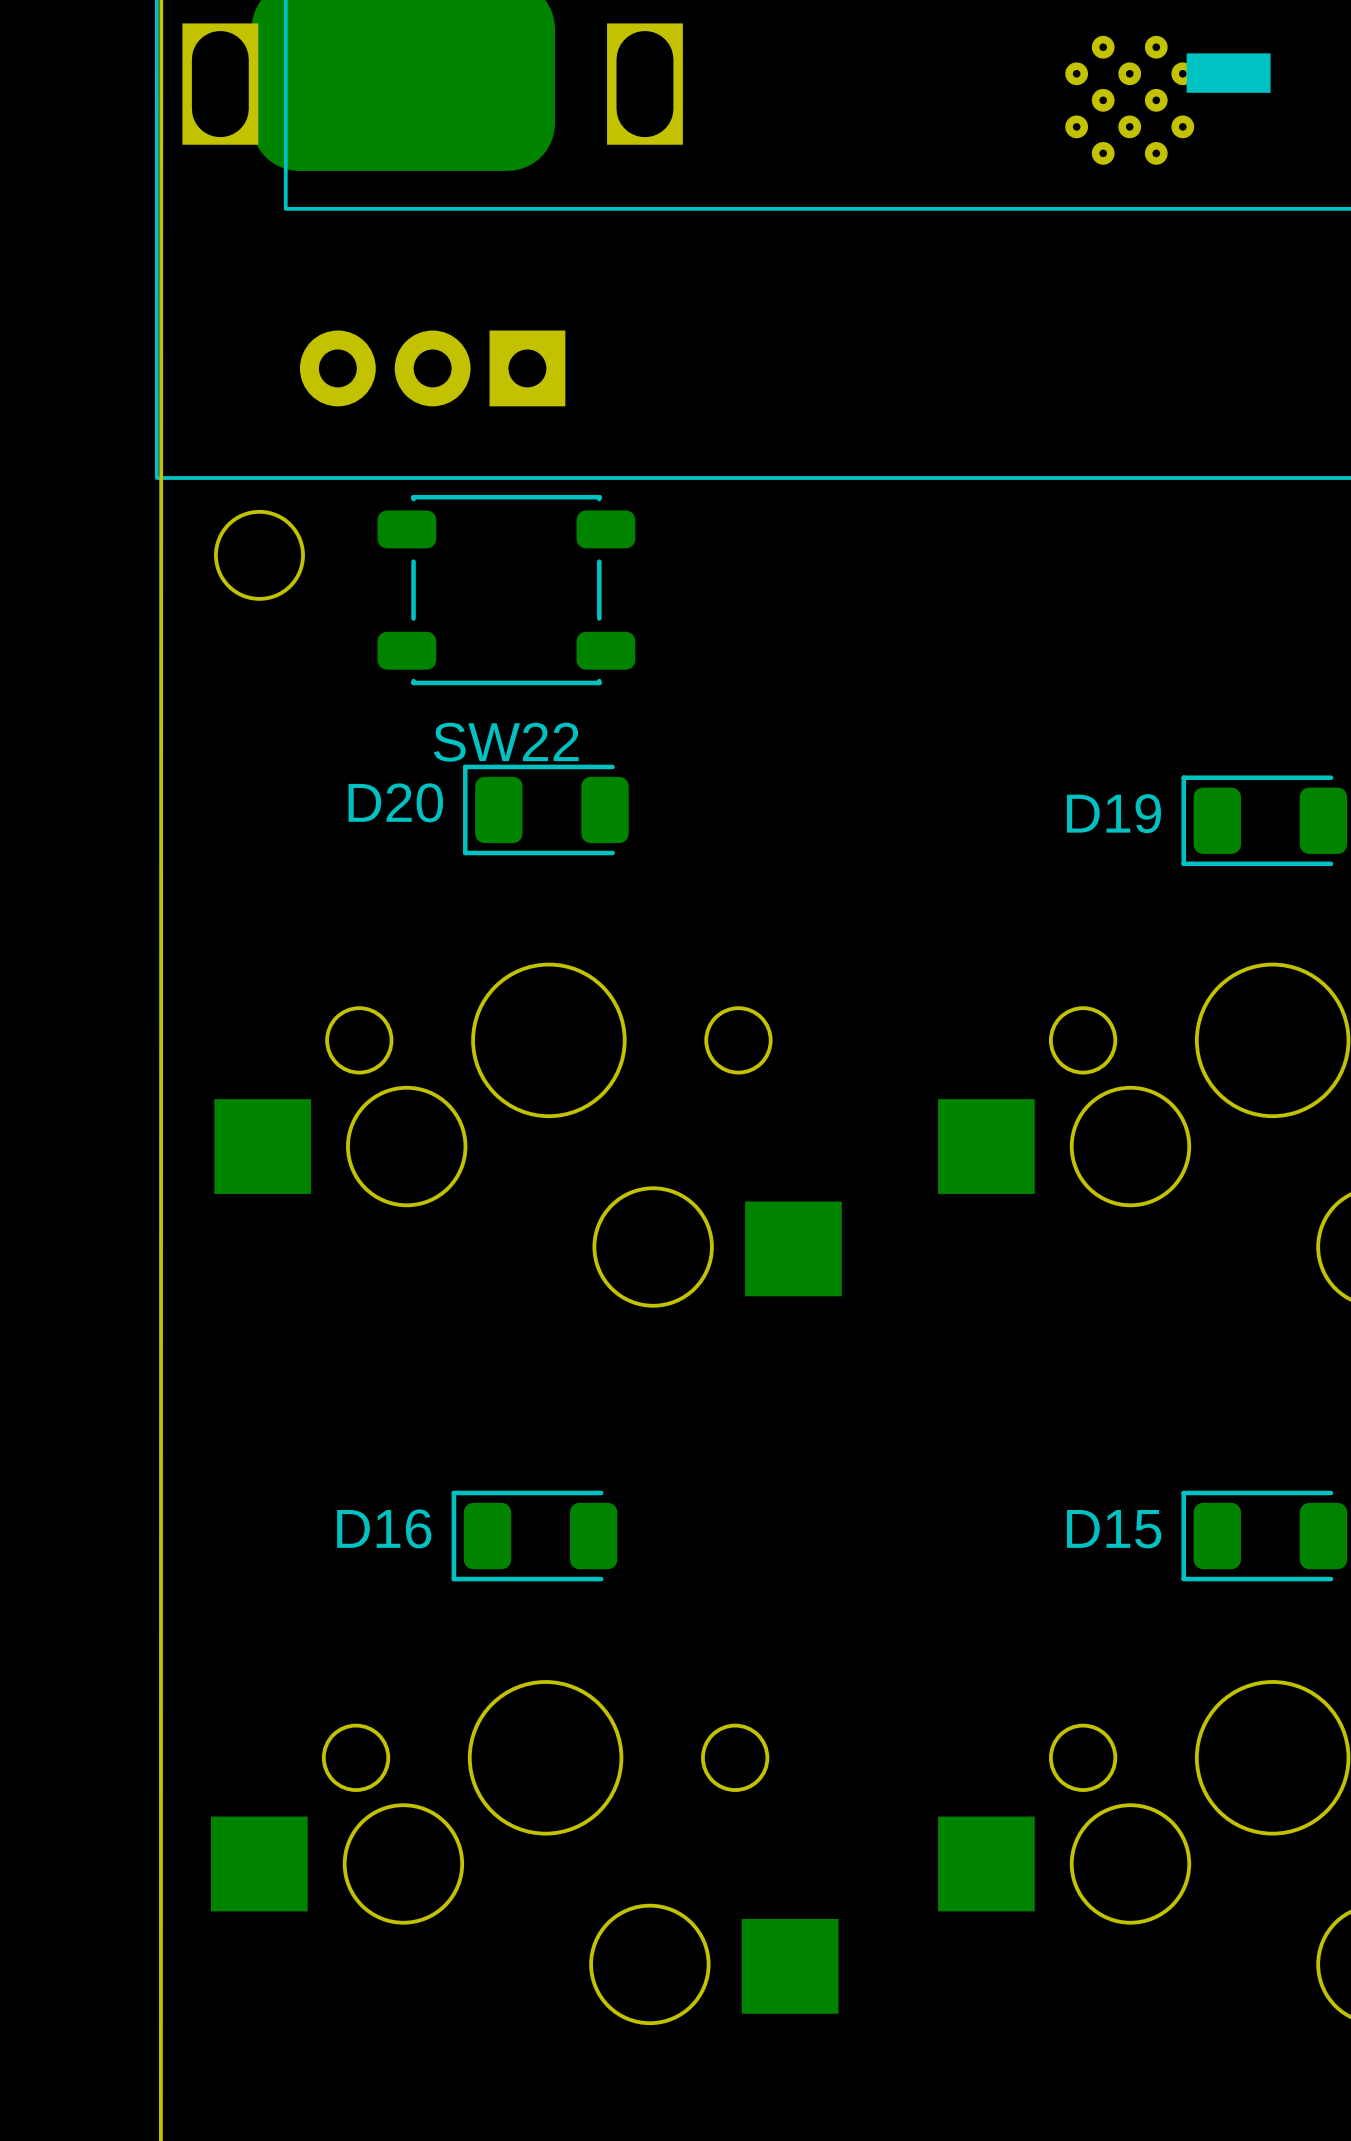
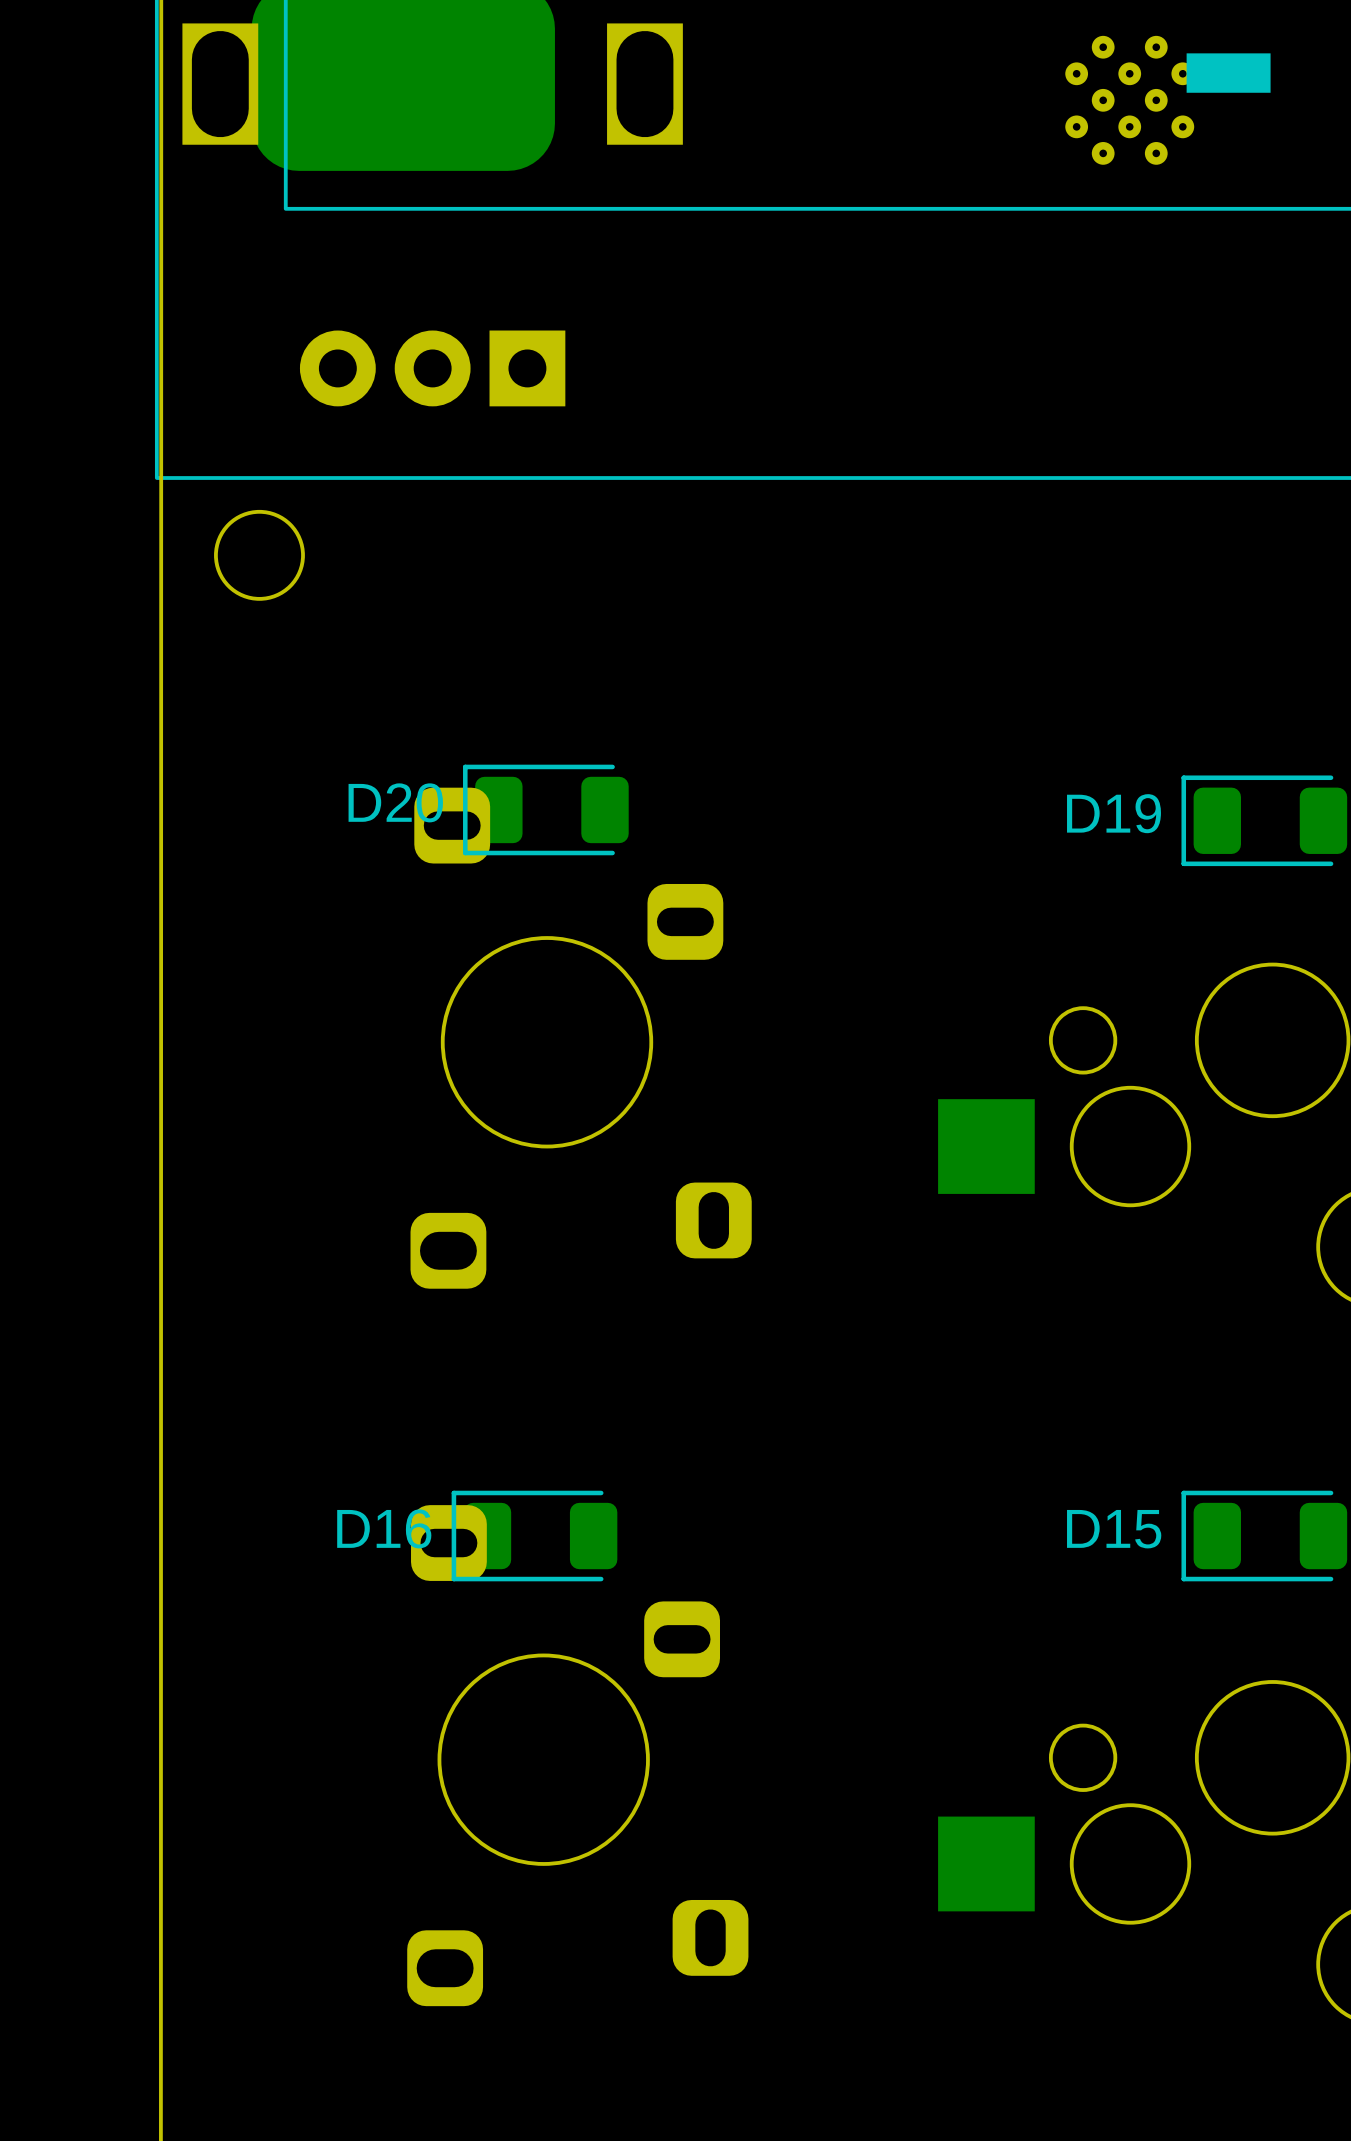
SW22: (506, 590) -> none
part: none -> (581, 1038)
part: (528, 1135) -> none
part: none -> (577, 1755)
part: (524, 1852) -> none

